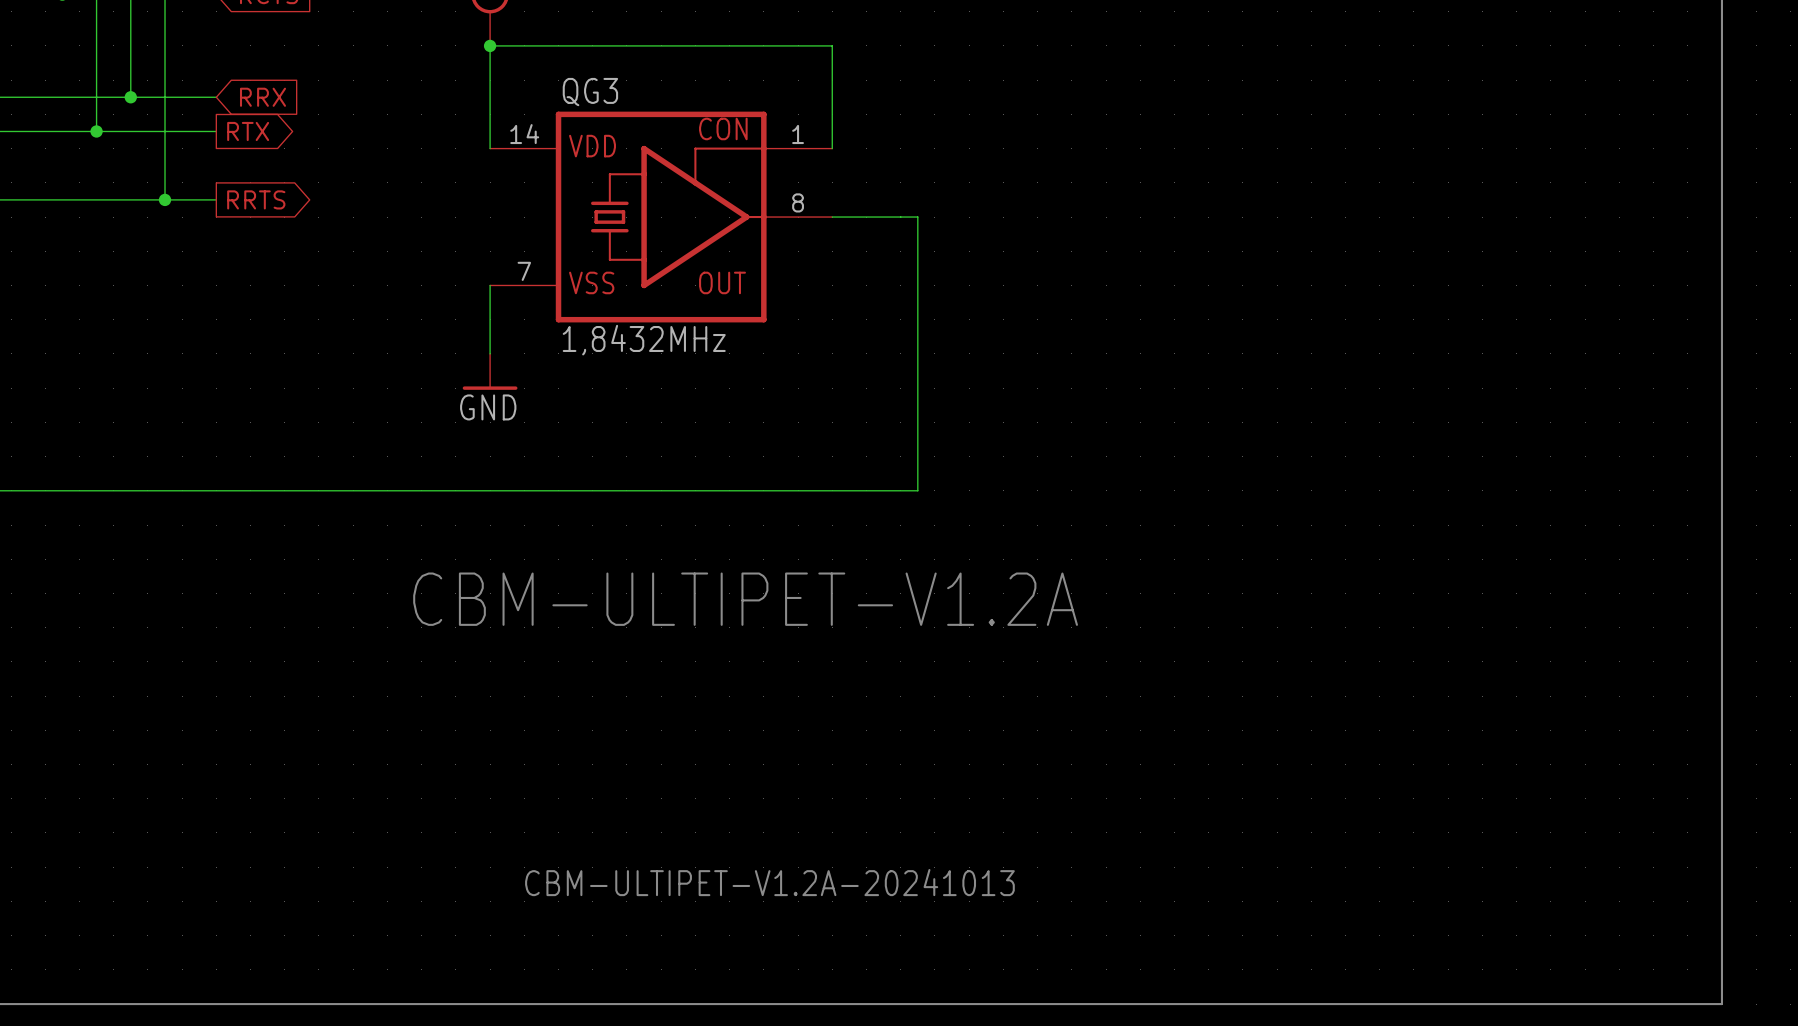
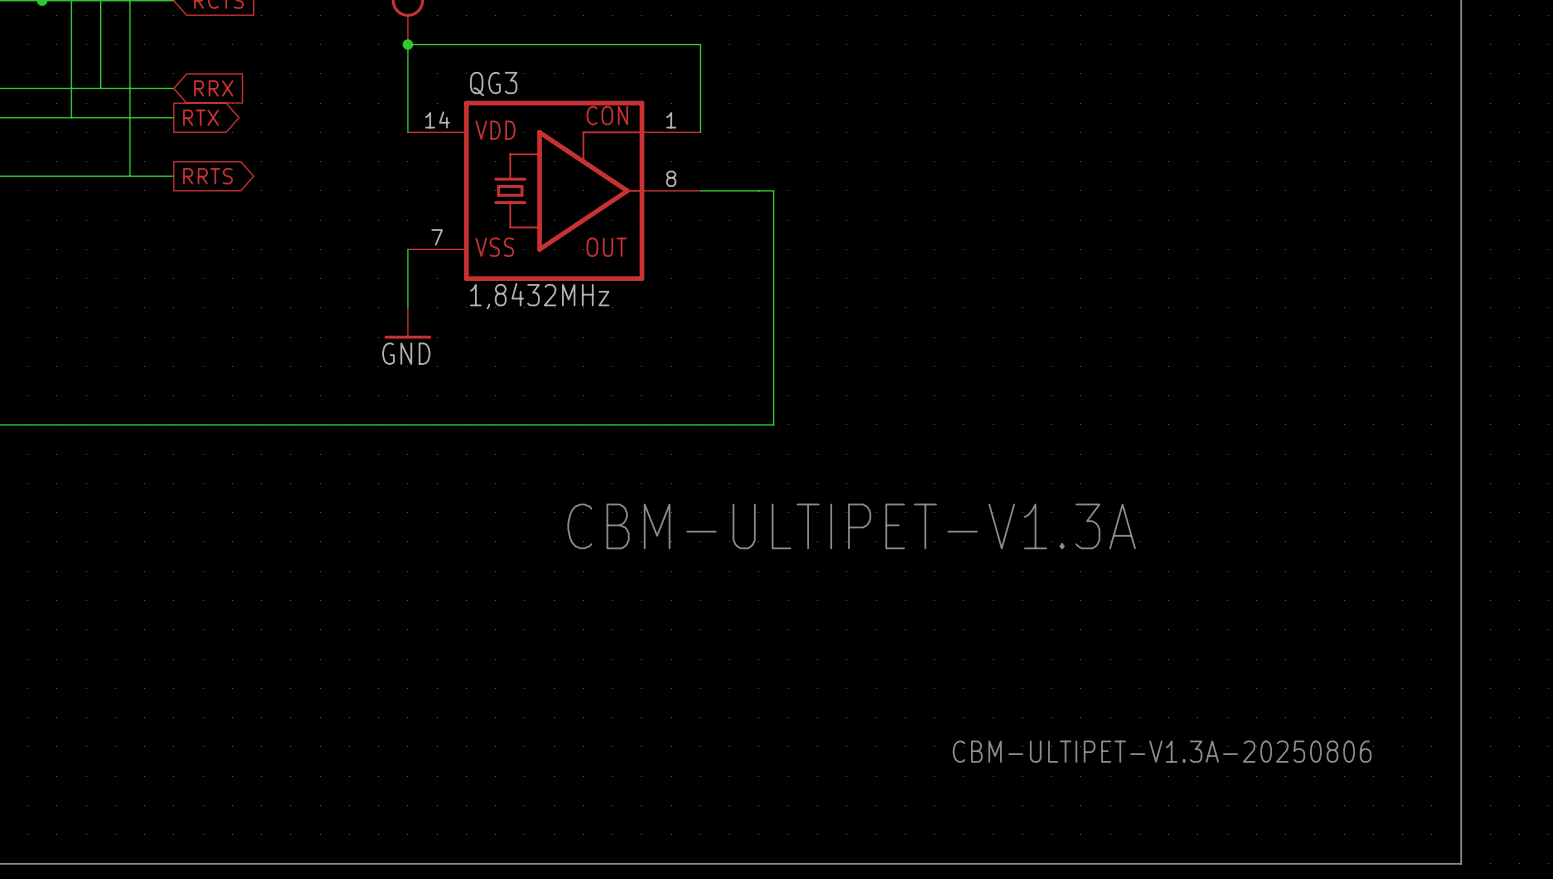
junction: (130, 97) -> none
junction: (96, 131) -> none
junction: (165, 199) -> none
text: CBM-ULTIPET-V1.2A (745, 599) -> CBM-ULTIPET-V1.3A (851, 526)
text: none -> CBM-ULTIPET-V1.3A-20250806 (1162, 751)
text: CBM-ULTIPET-V1.2A-20241013 (769, 882) -> none

